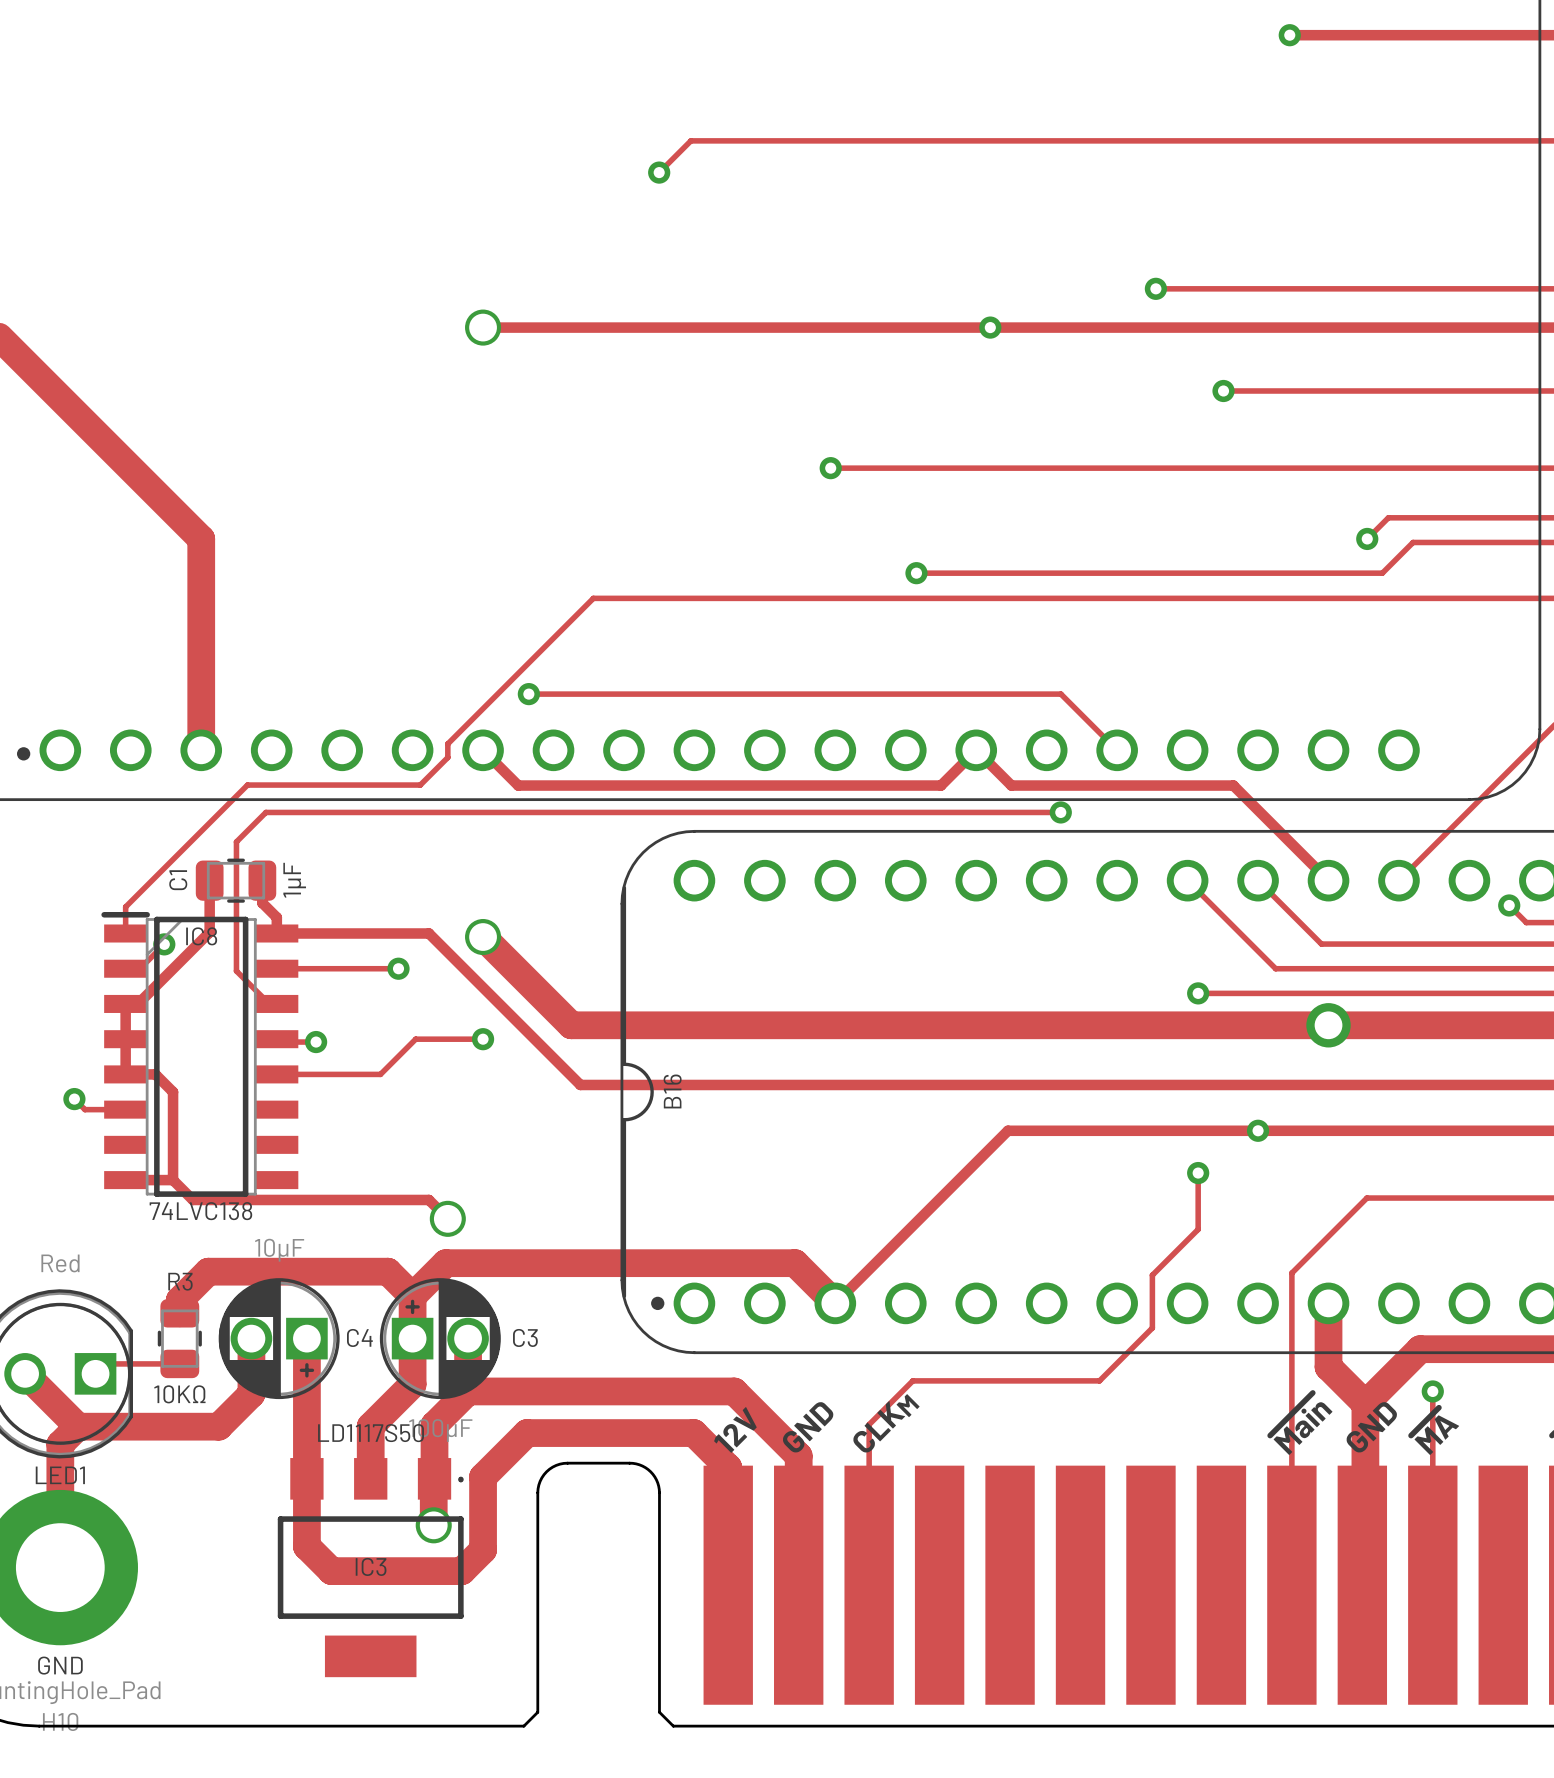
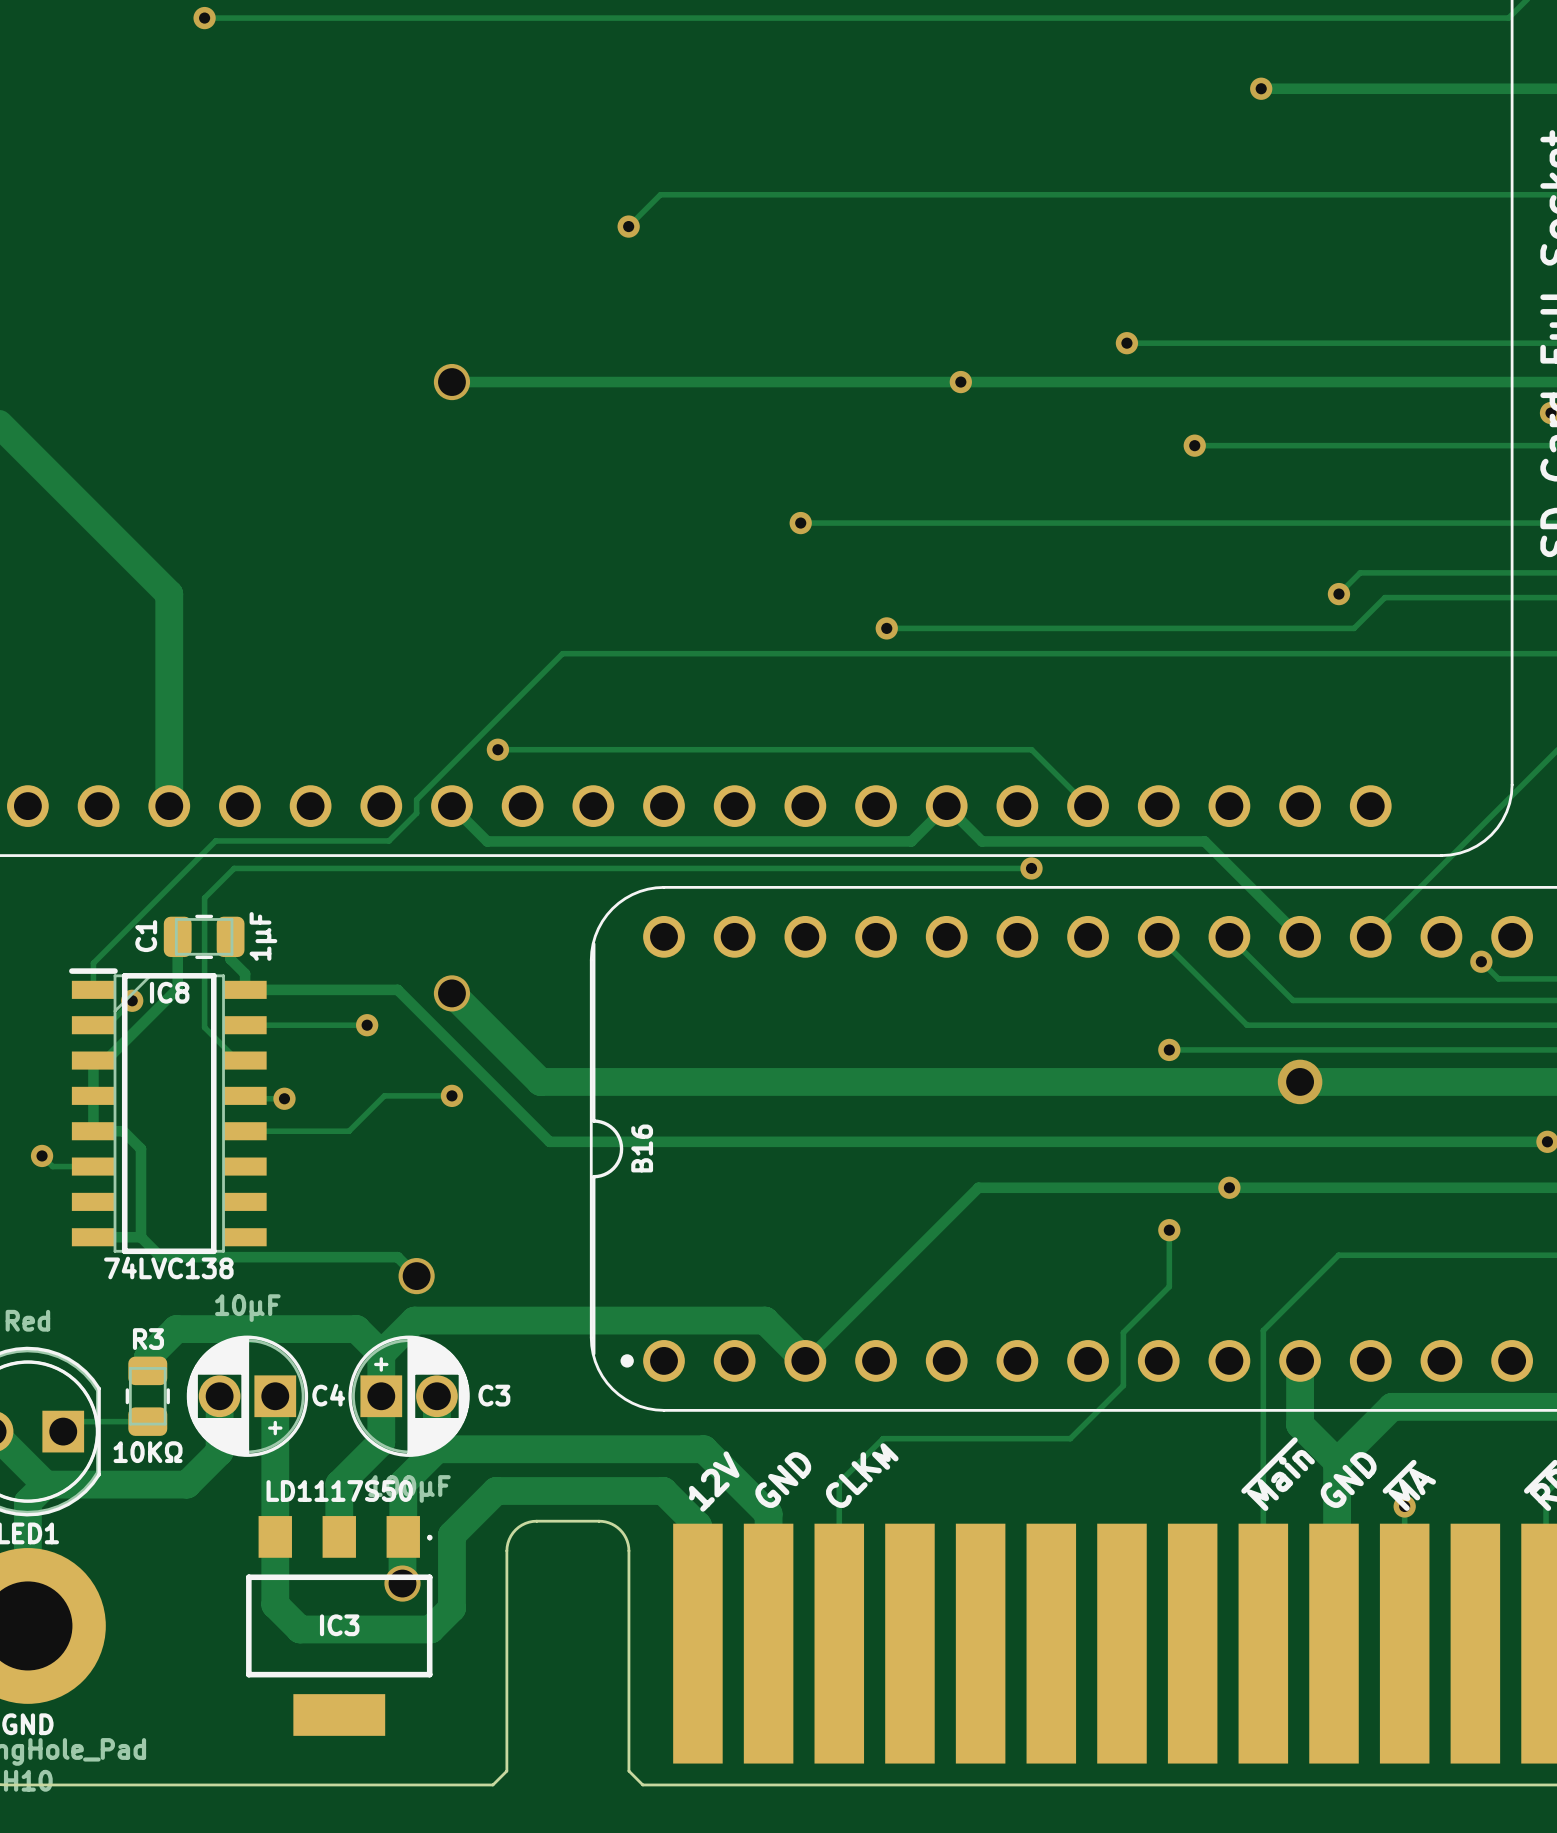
track: (1432, 1391) (1432, 1448) -> none
via position: (1432, 1391) -> (1404, 1506)

